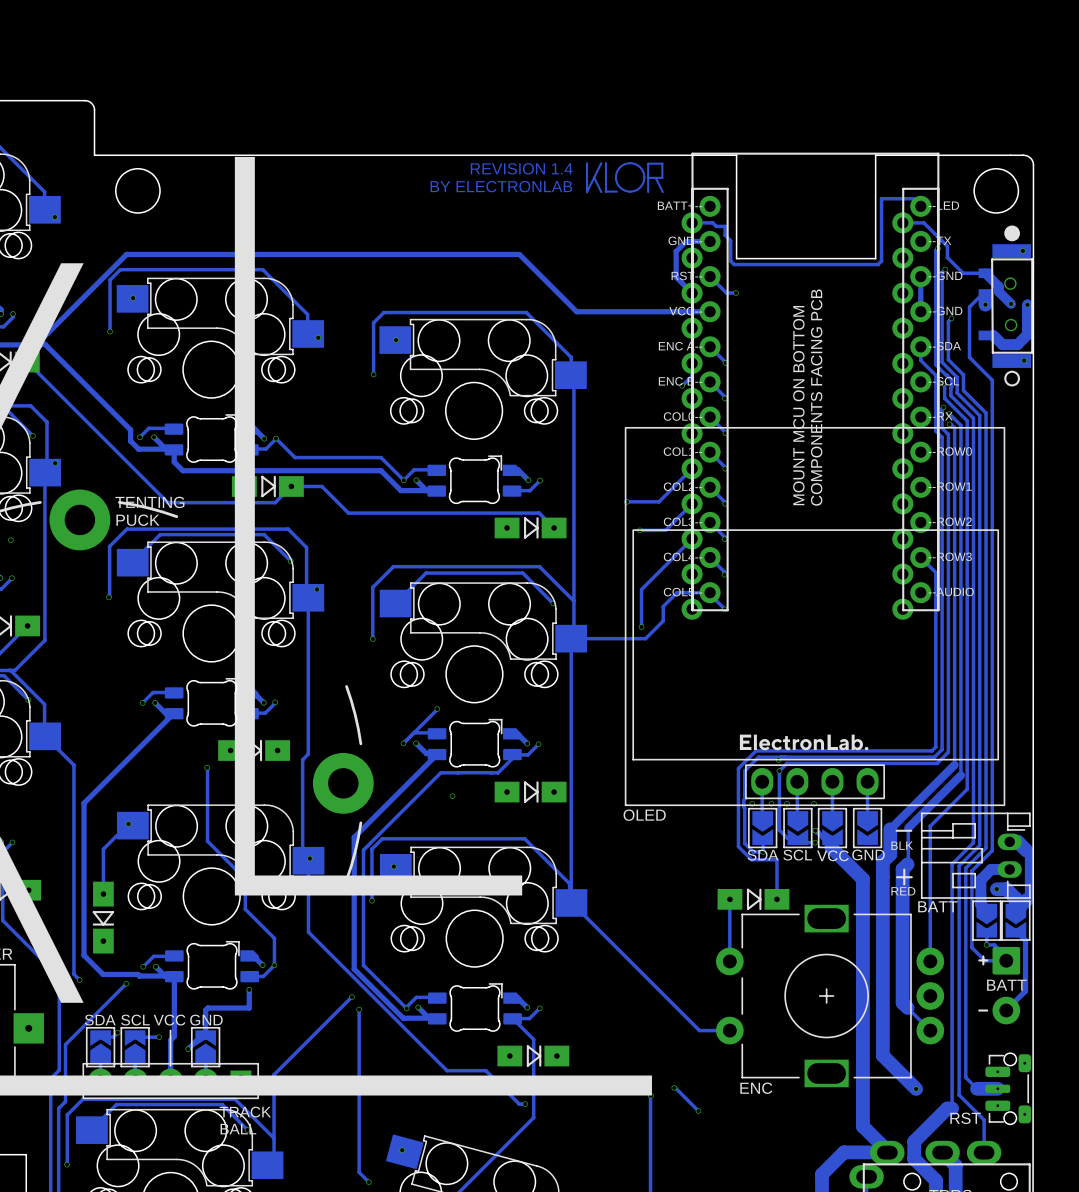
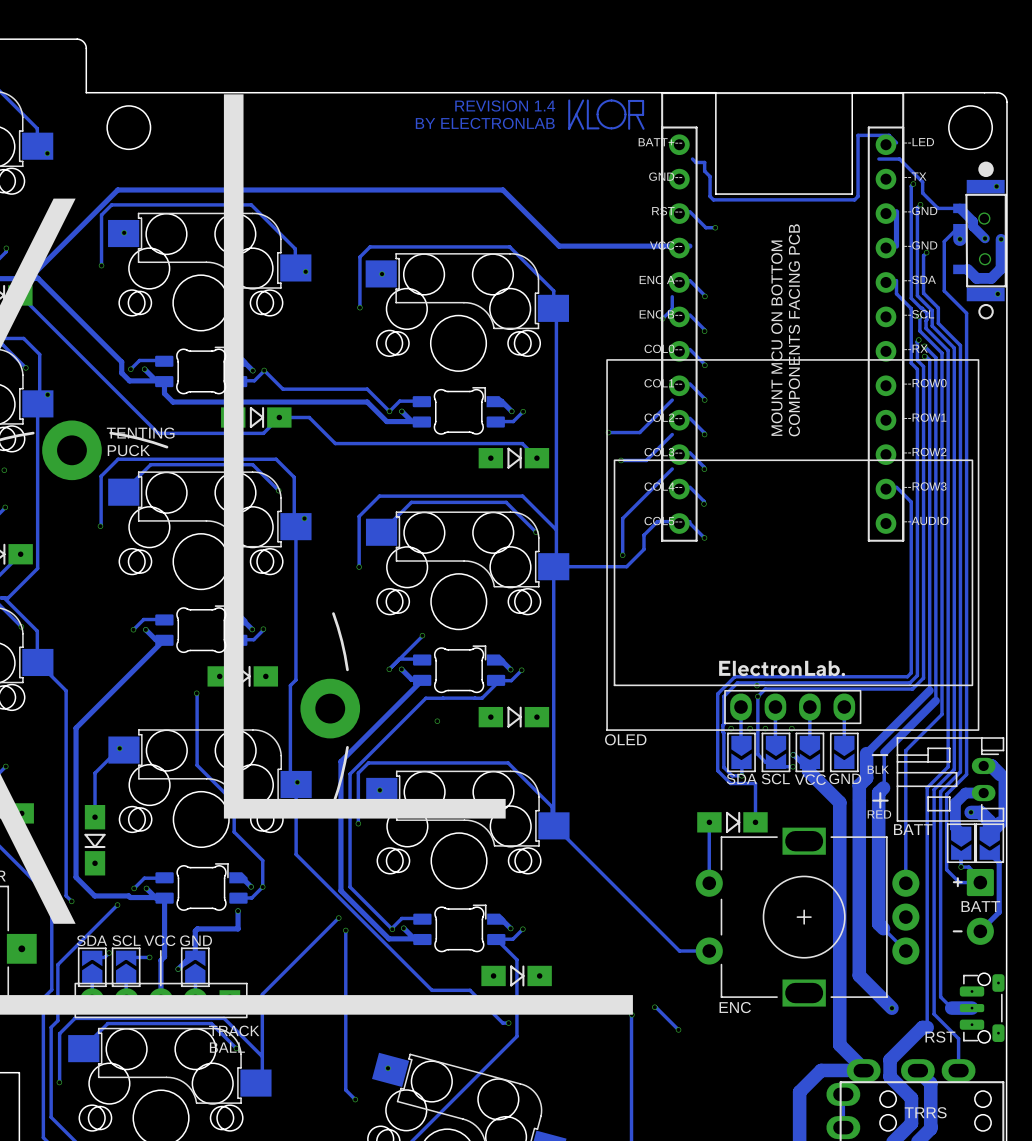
part footprint: [681, 152, 940, 620] -> [661, 92, 905, 542]
track: (712, 222) (692, 222) -> none
track: (710, 241) (686, 241) (676, 251) (676, 277) (692, 293) -> none

